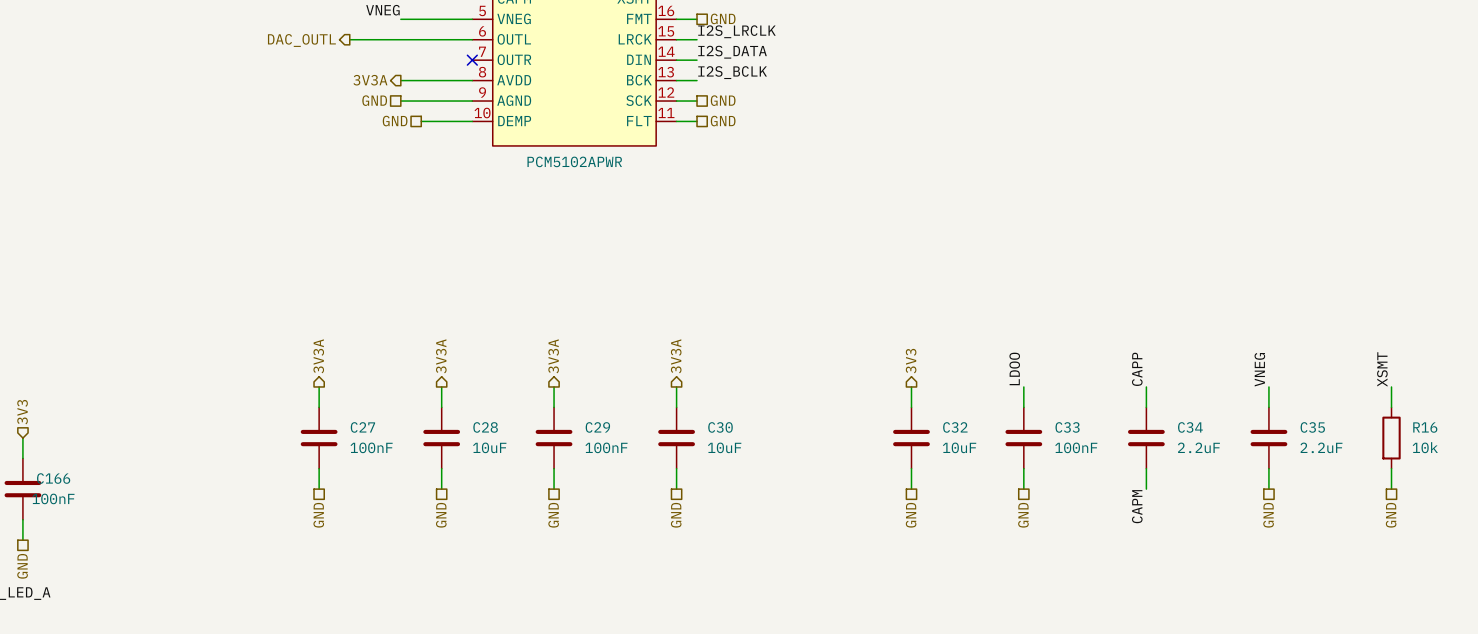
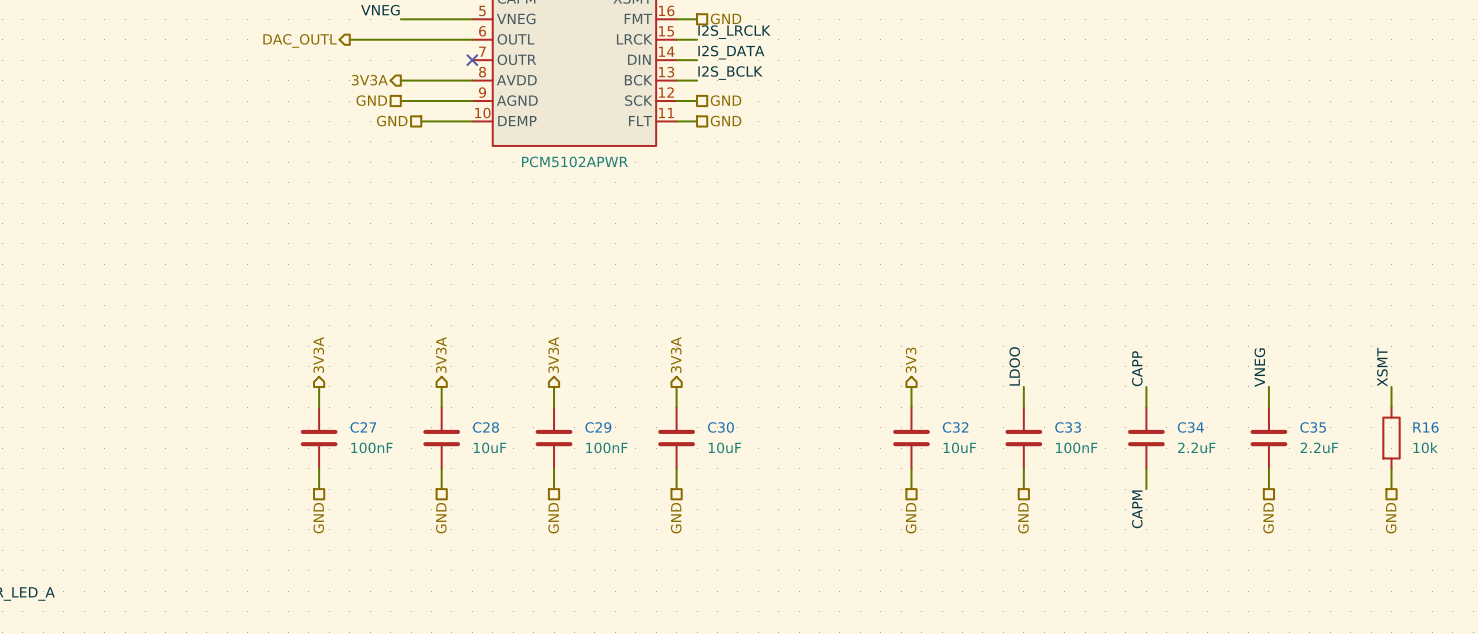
hierarchical label: 3V3 (22, 412) -> none
wire: (22, 438) (22, 458) -> none
C166: 100nF (22, 489) -> none
wire: (22, 519) (22, 540) -> none
hierarchical label: GND (22, 566) -> none

